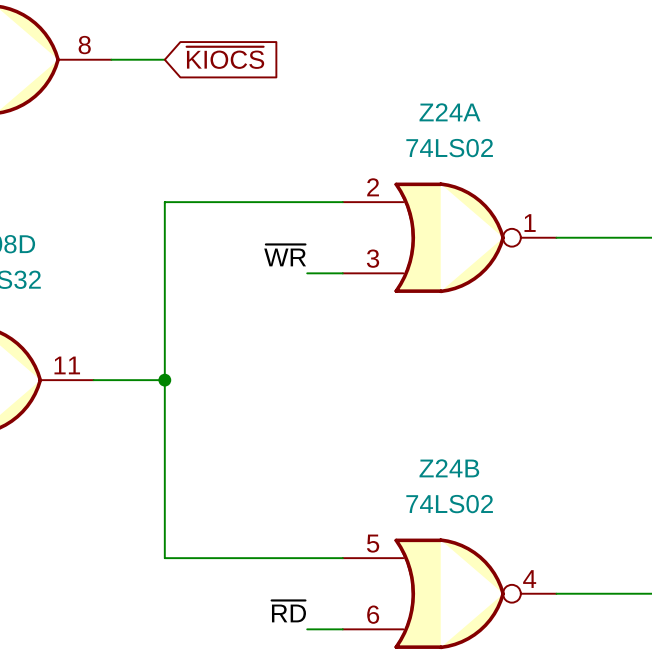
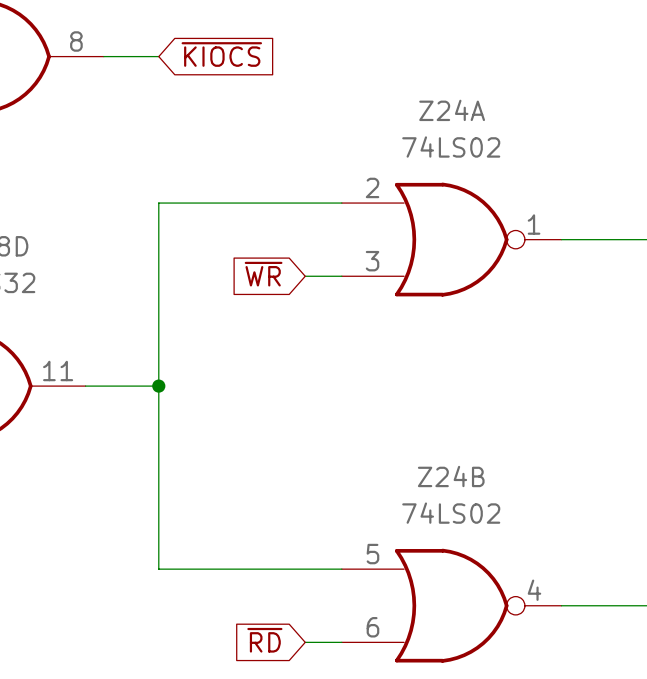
label: ~{WR} (285, 255) -> none
global label: none -> ~{WR} (263, 274)
label: ~{RD} (288, 611) -> none
global label: none -> ~{RD} (264, 640)

